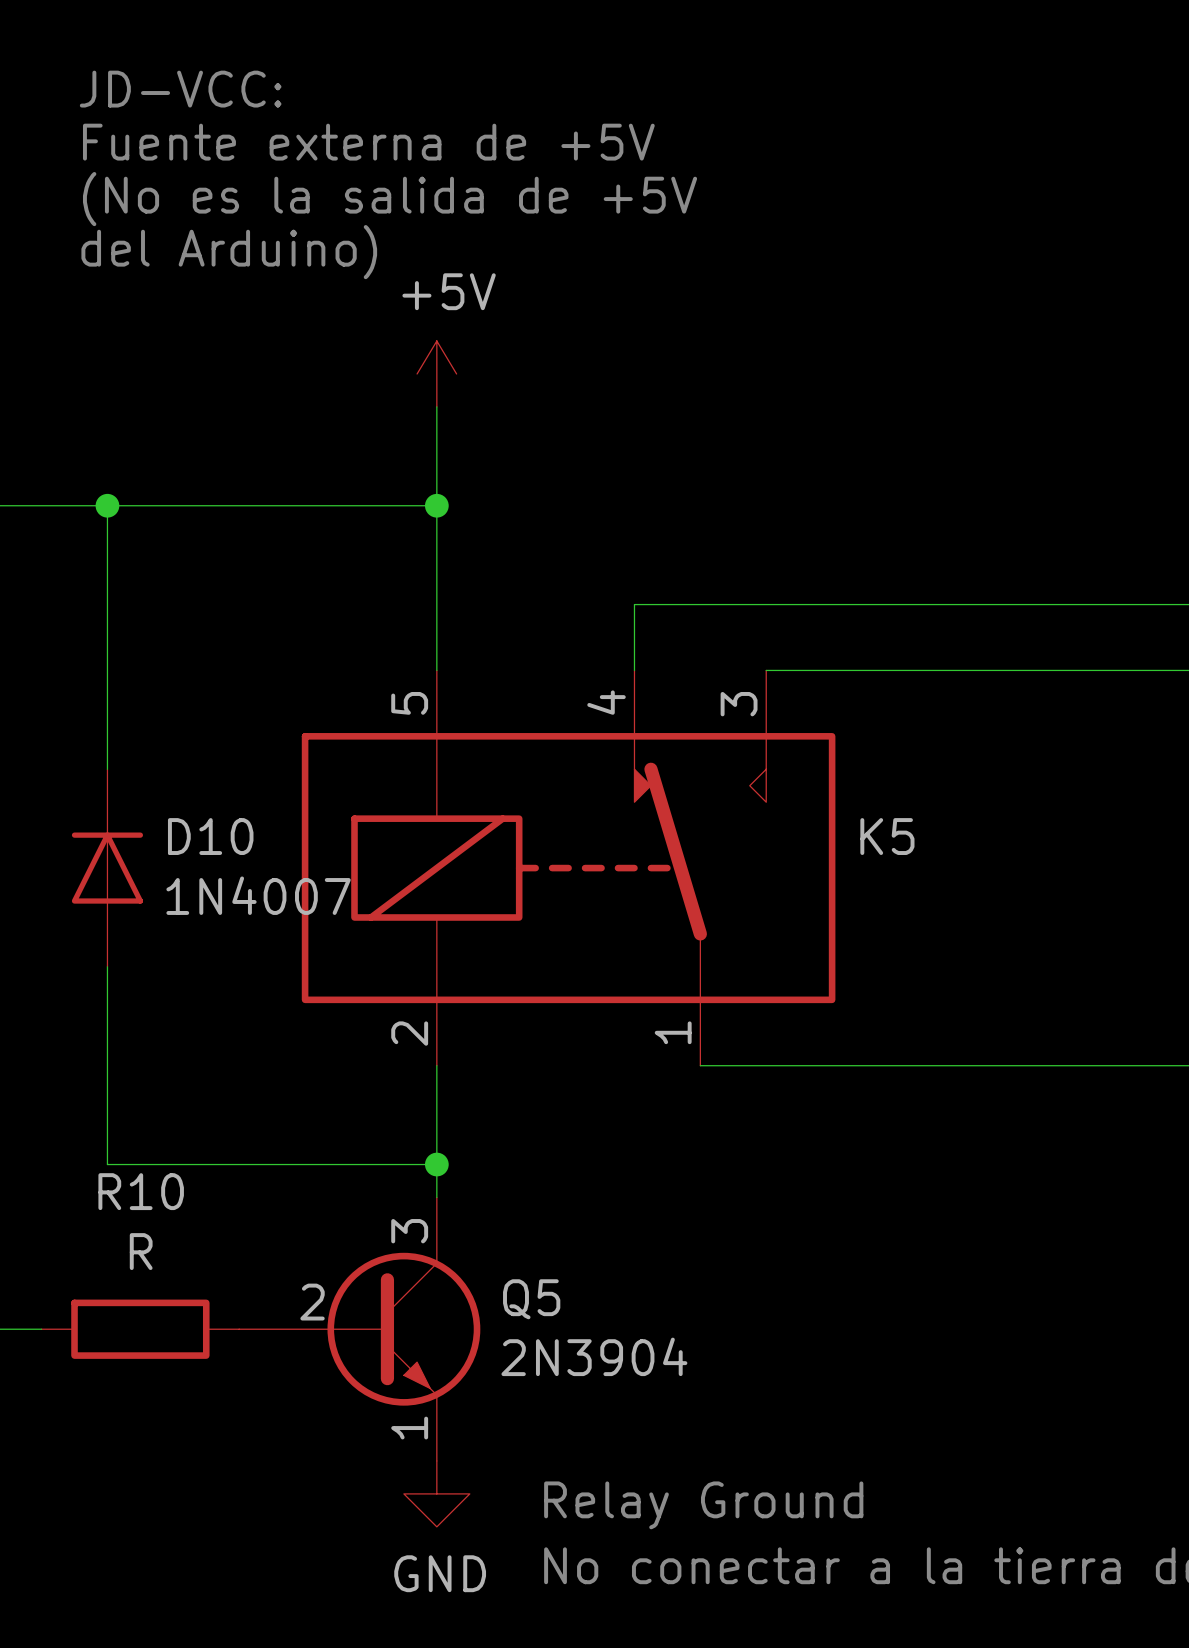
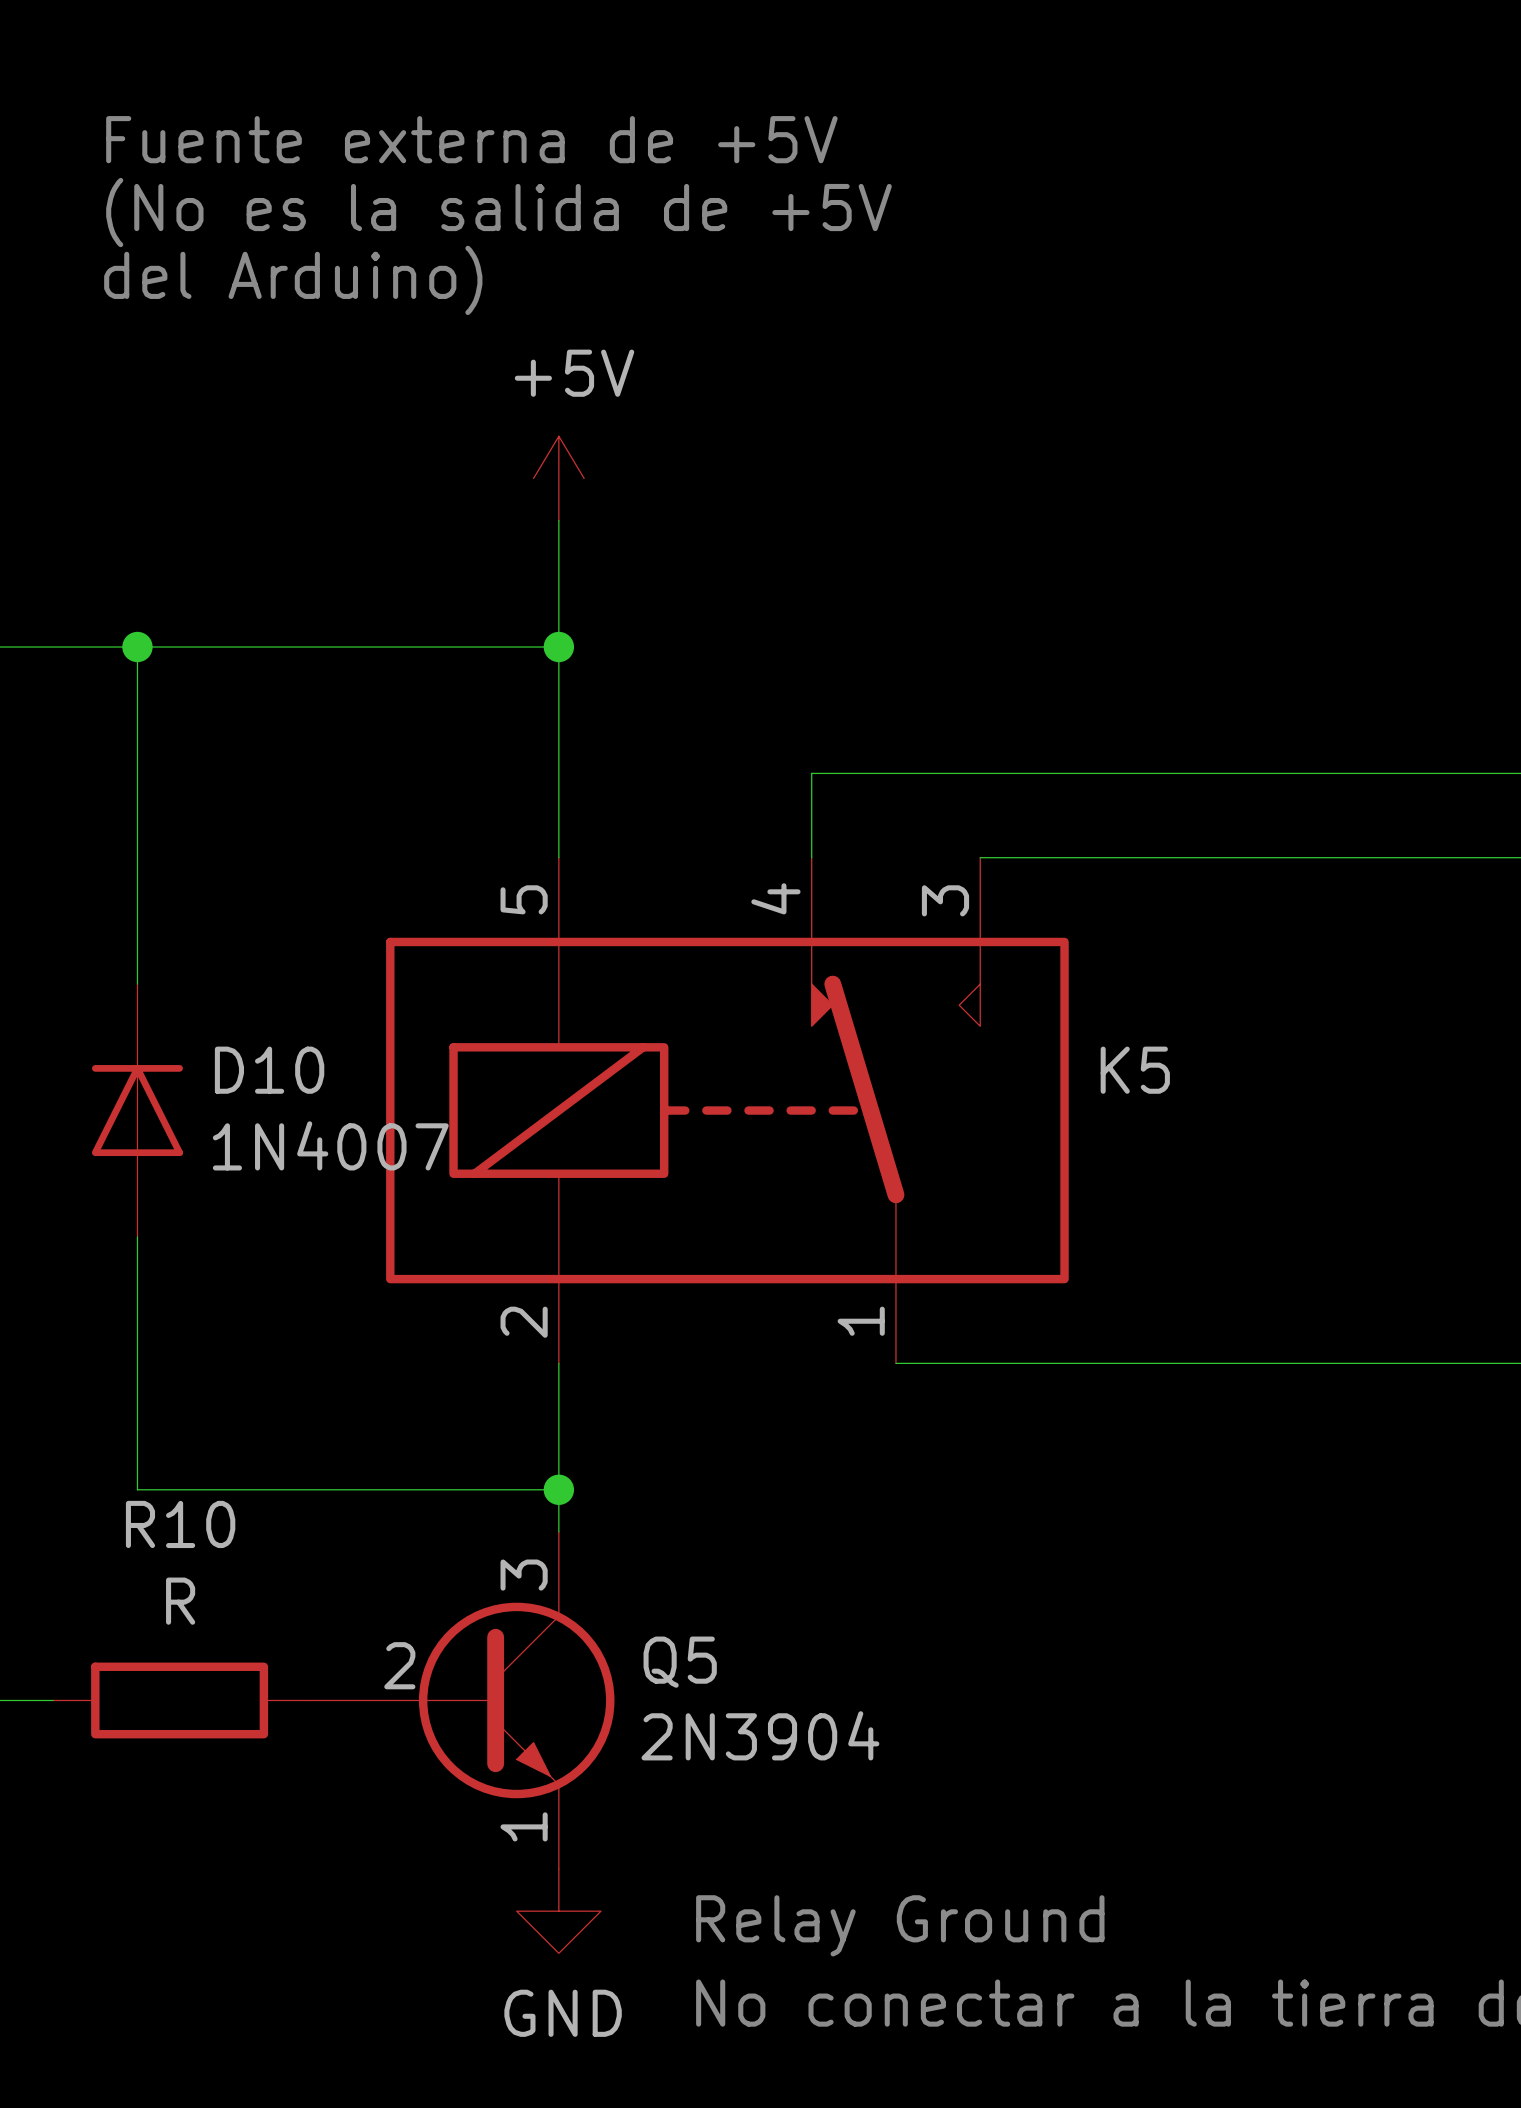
text: JD-VCC: (180, 89) -> none
text position: Fuente externa de +5V (368, 142) -> Fuente externa de +5V (471, 139)
text position: (No es la salida de +5V (390, 199) -> (No es la salida de +5V (498, 212)
text position: del Arduino) (229, 252) -> del Arduino) (293, 280)

